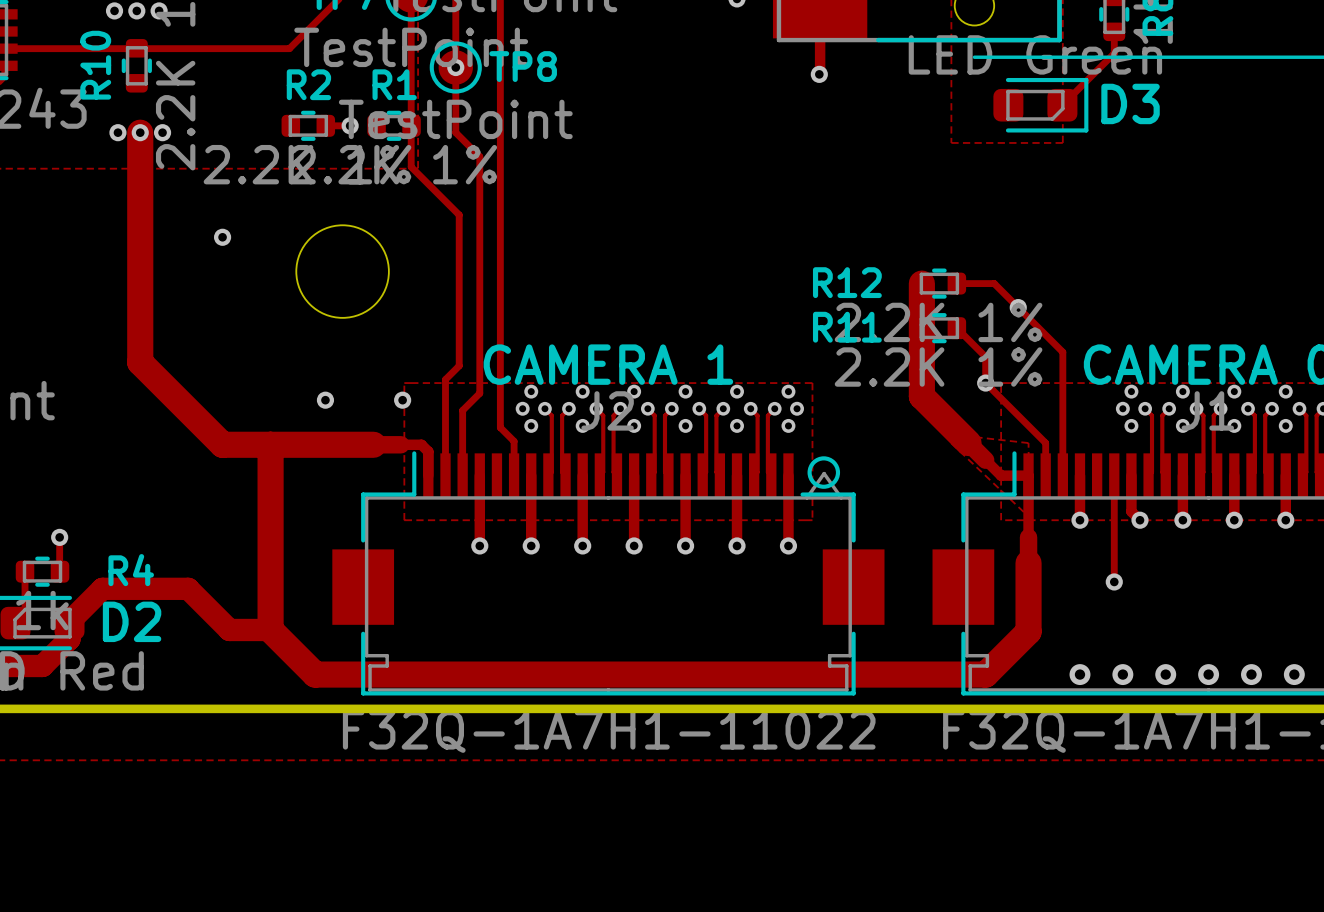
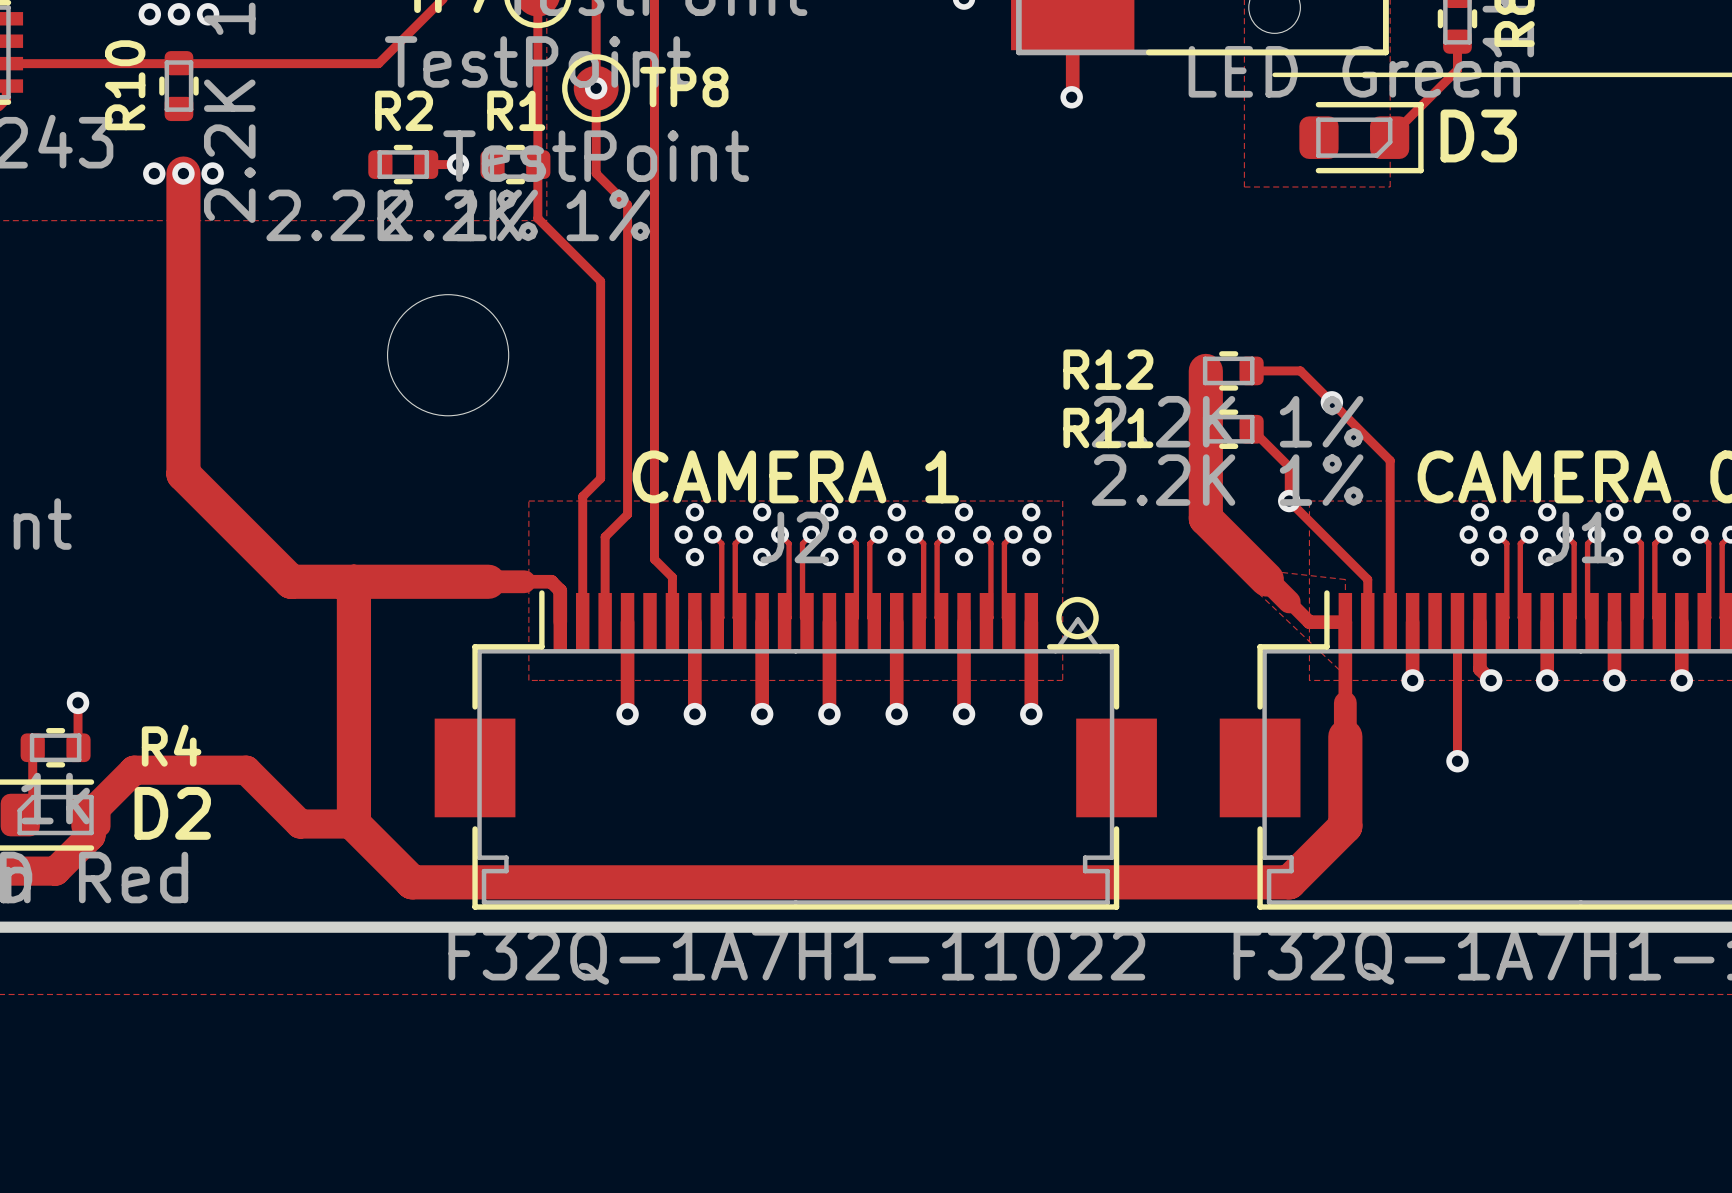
via: (222, 237) -> none
via: (325, 400) -> none
via: (402, 400) -> none
via: (1079, 674) -> none
via: (1122, 674) -> none
via: (1165, 674) -> none
via: (1208, 674) -> none
via: (1251, 674) -> none
via: (1294, 674) -> none

